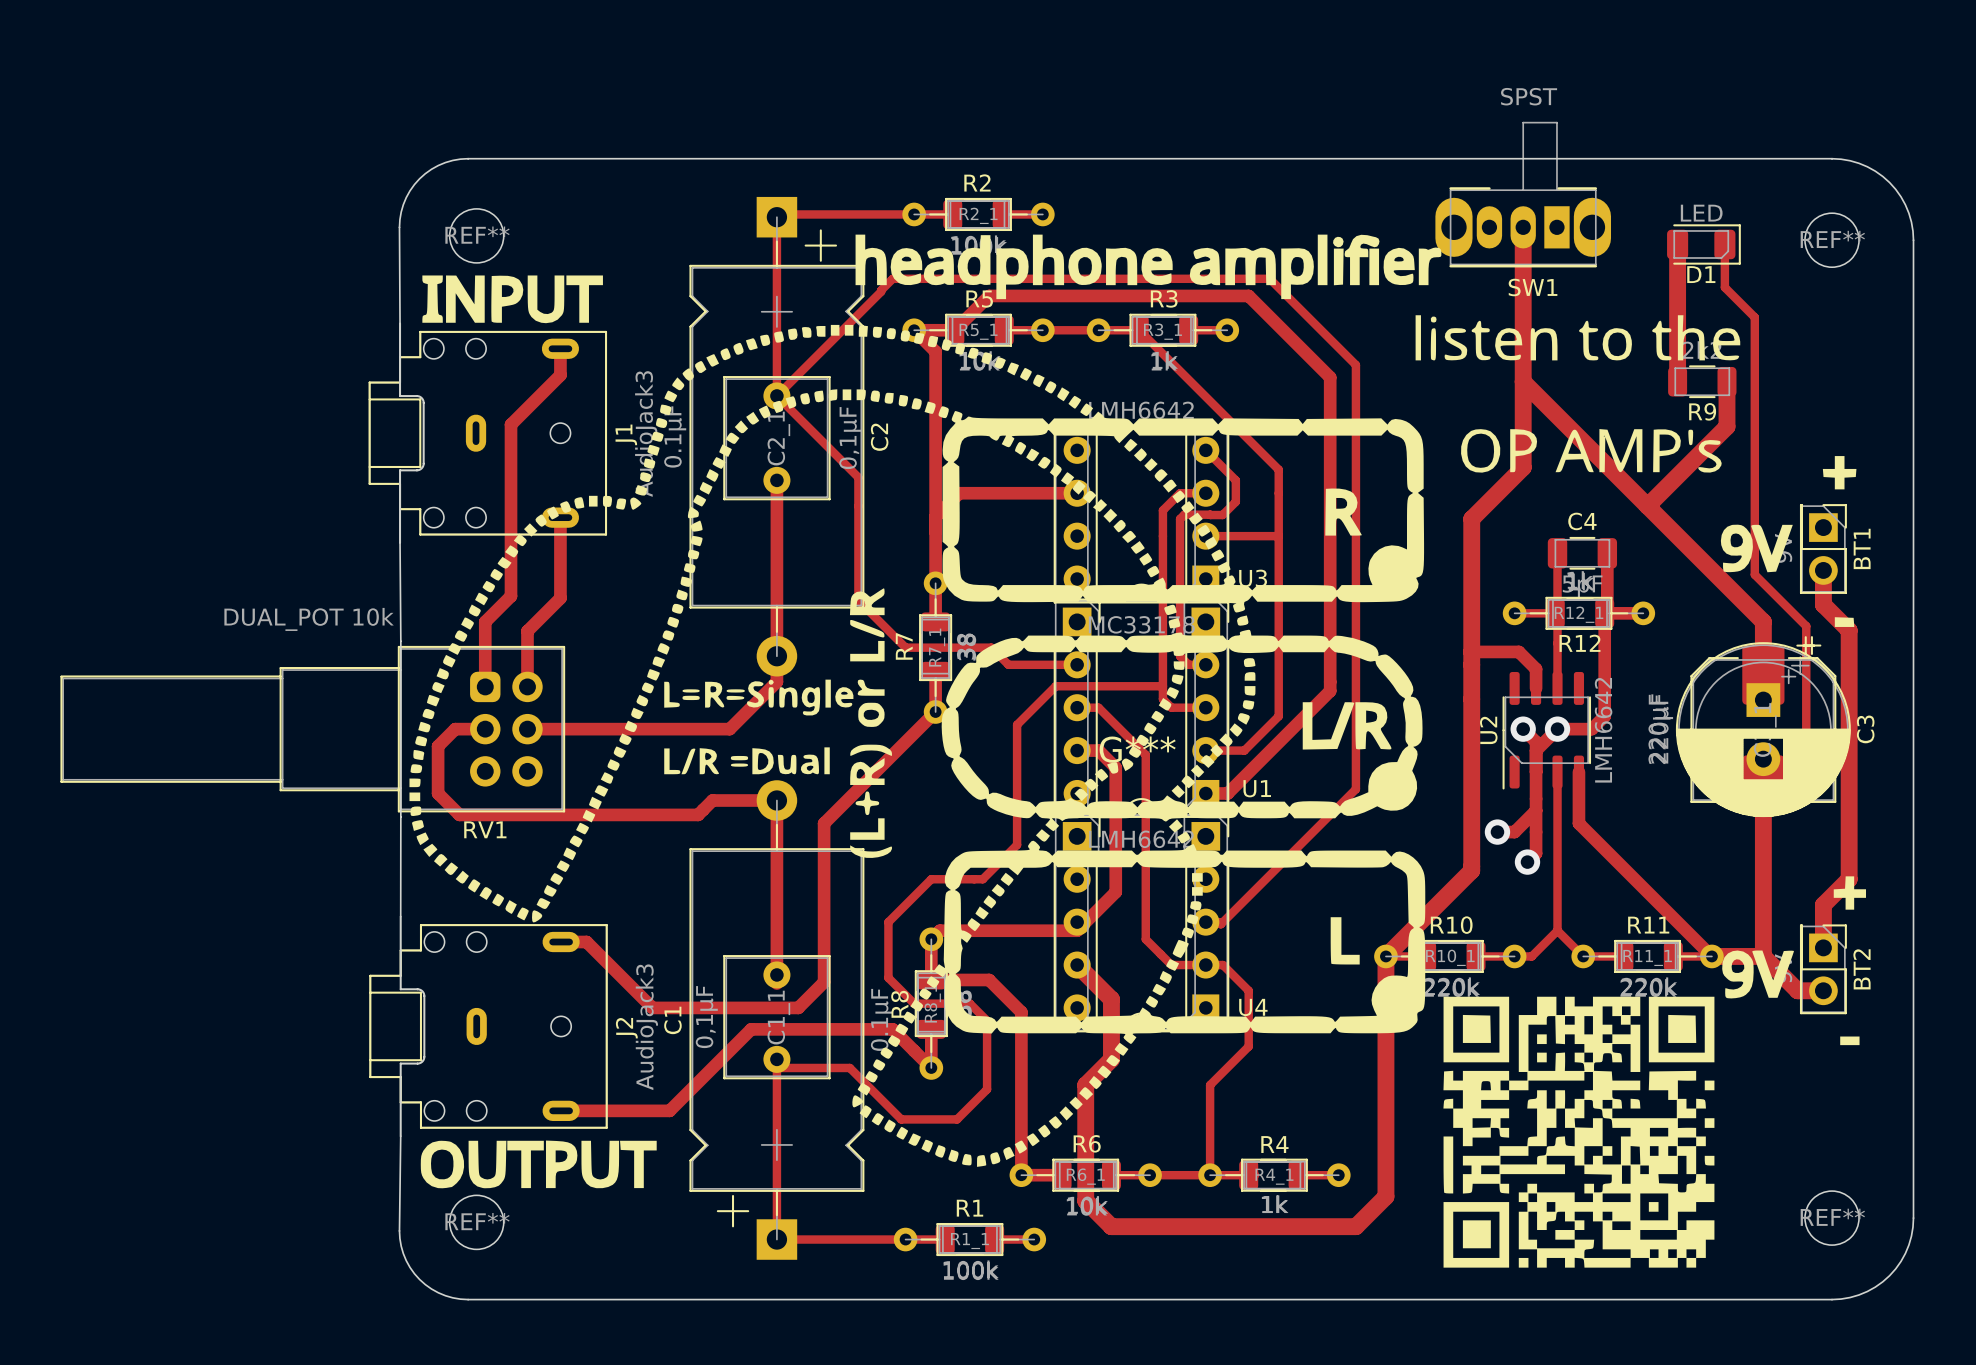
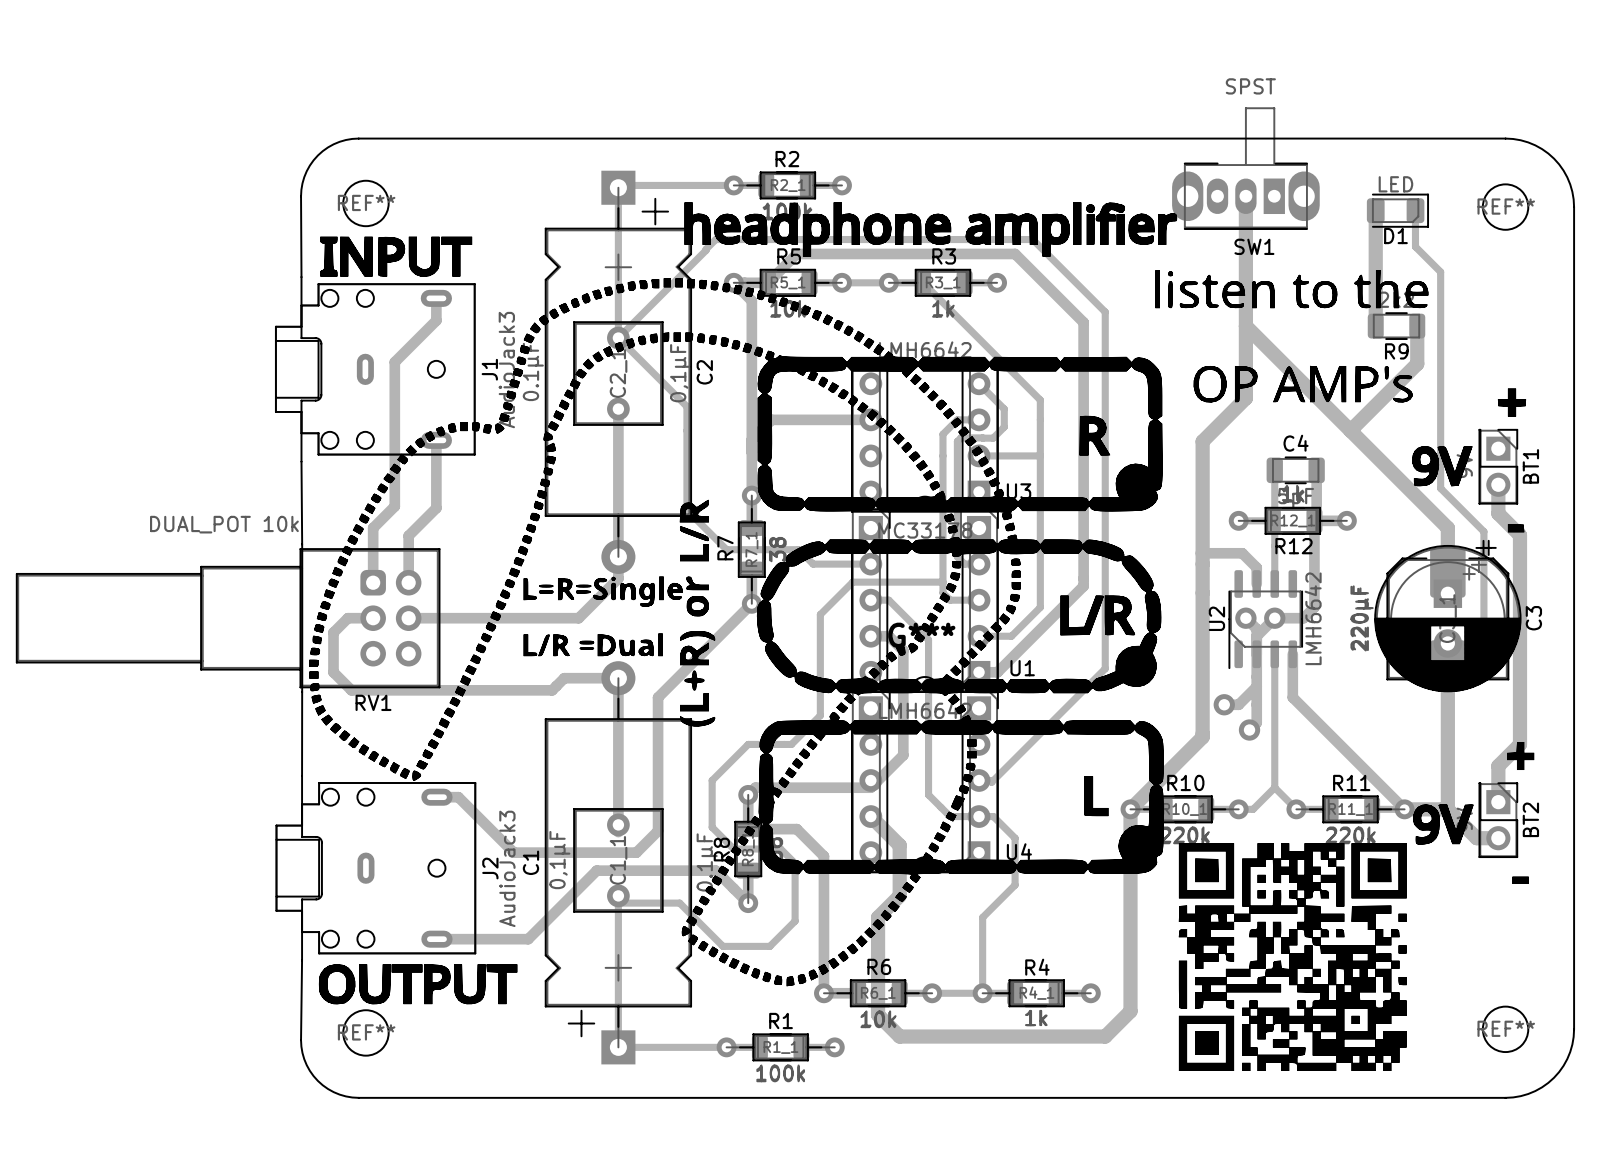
drawing: none -> [309, 202, 1535, 1071]

